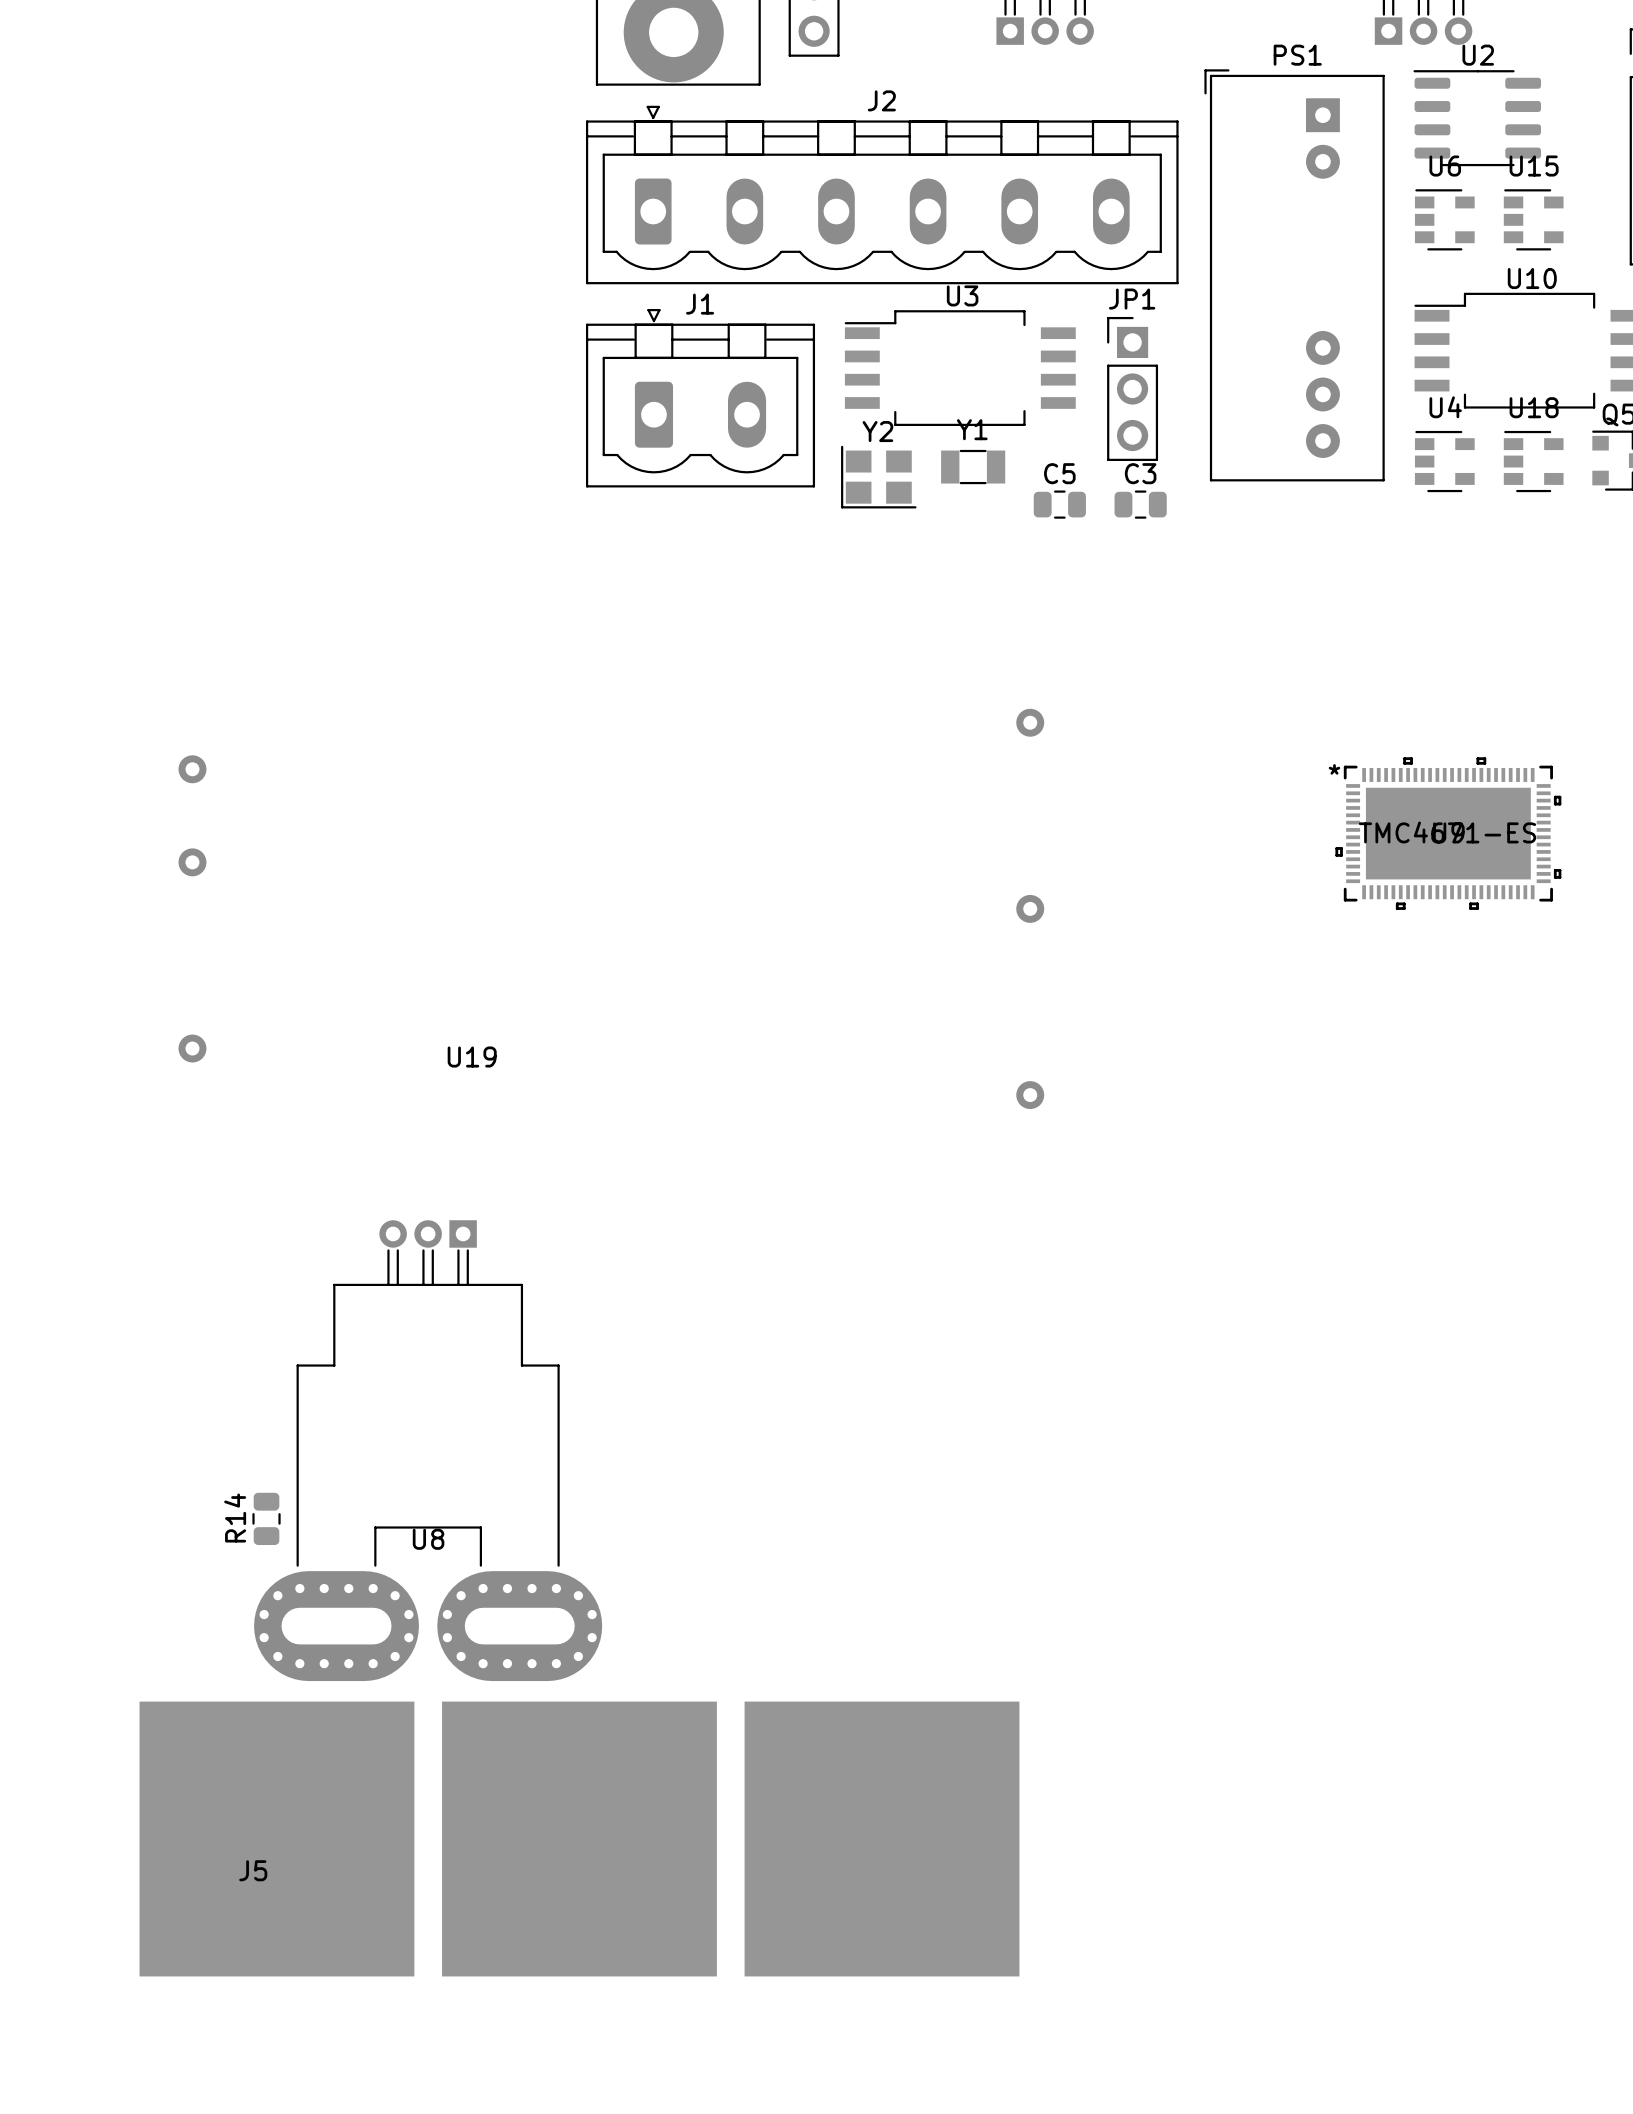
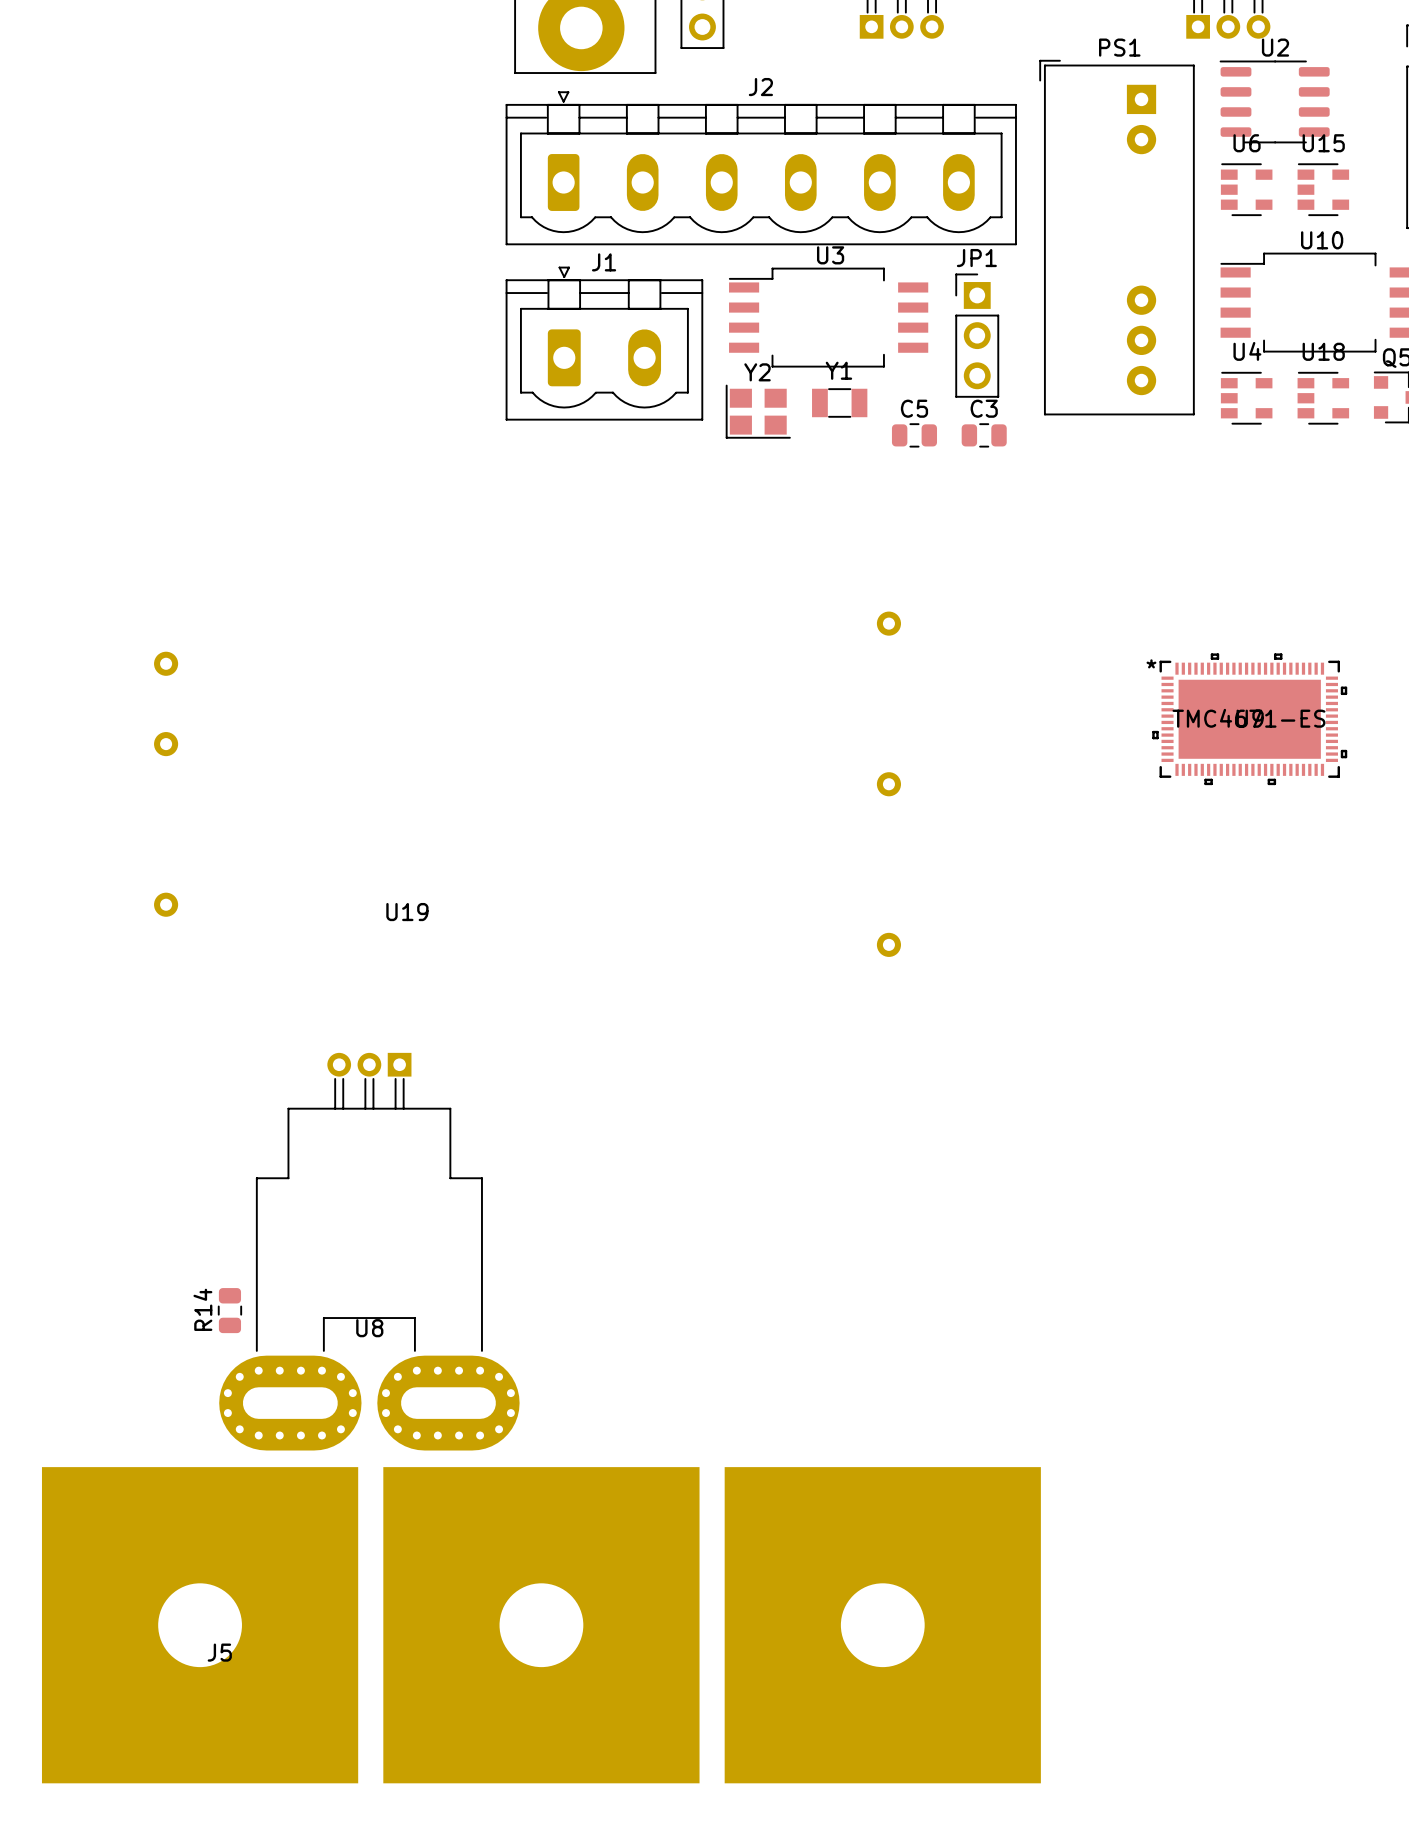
J5 footprint: [139, 1701, 1020, 1977] -> [41, 1467, 1041, 1784]
J5 name position: J5 (253, 1870) -> J5 (219, 1652)

